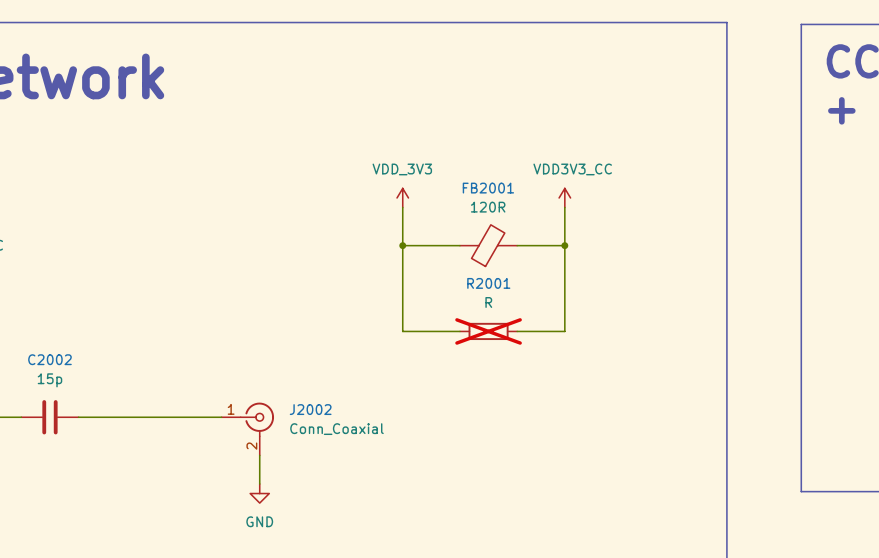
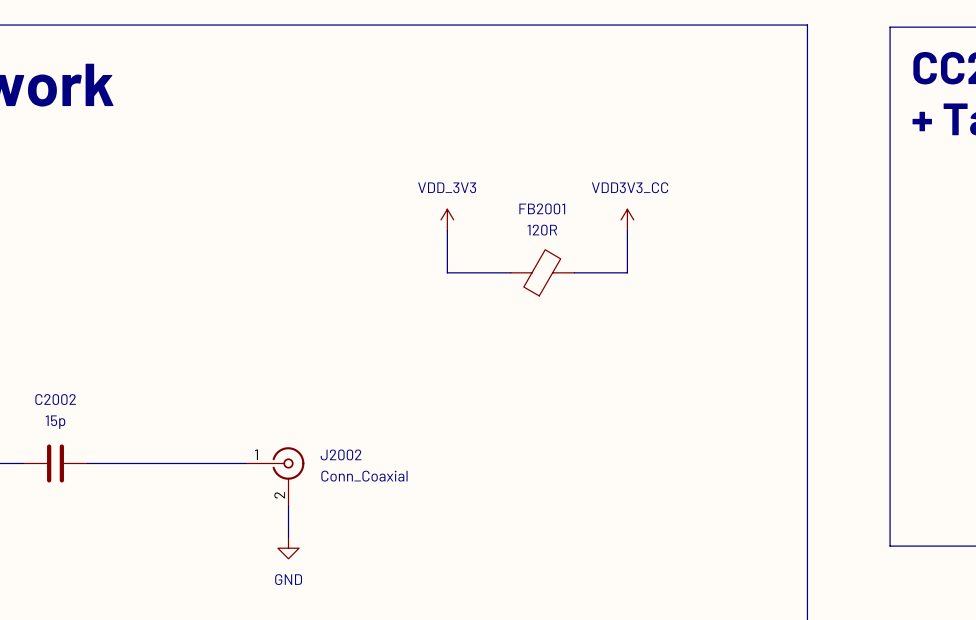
wire: (402, 245) (402, 331) (459, 331) -> none
junction: (402, 245) -> none
wire: (564, 245) (564, 331) (517, 331) -> none
junction: (564, 245) -> none
R2001: R (488, 331) -> none

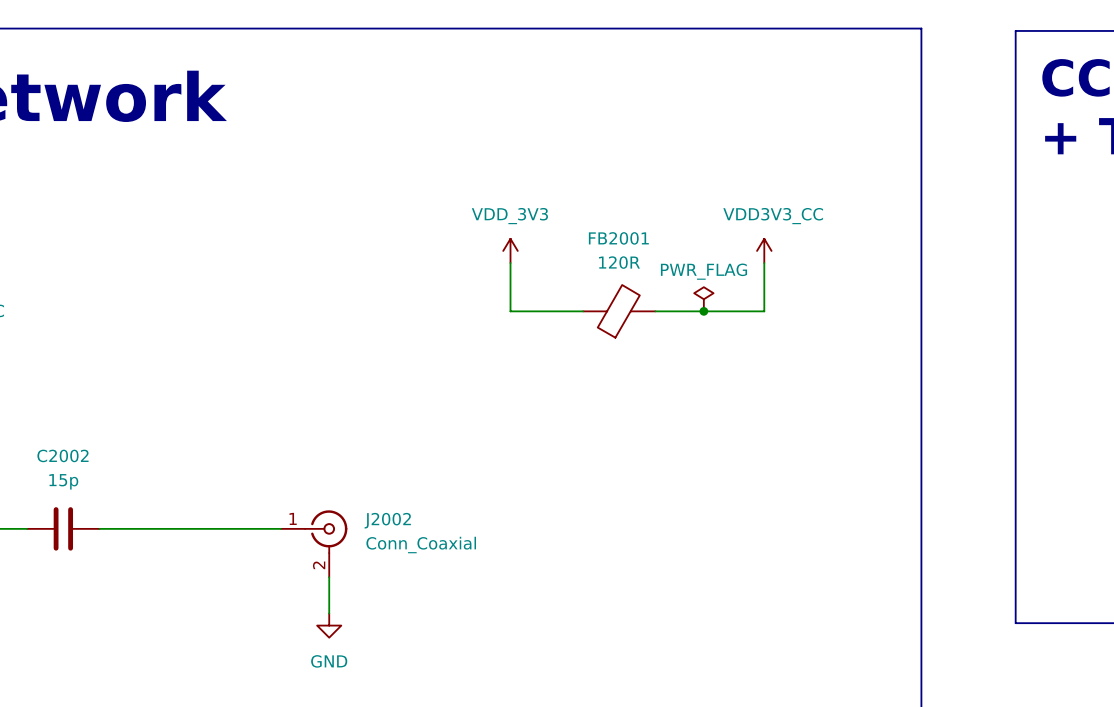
power symbol position: VDD3V3_CC (627, 219) -> VDD3V3_CC (764, 250)
wire: (627, 230) (627, 272) -> (764, 263) (764, 311) (715, 311)
power symbol: none -> PWR_FLAG (703, 299)
junction: none -> (703, 311)

